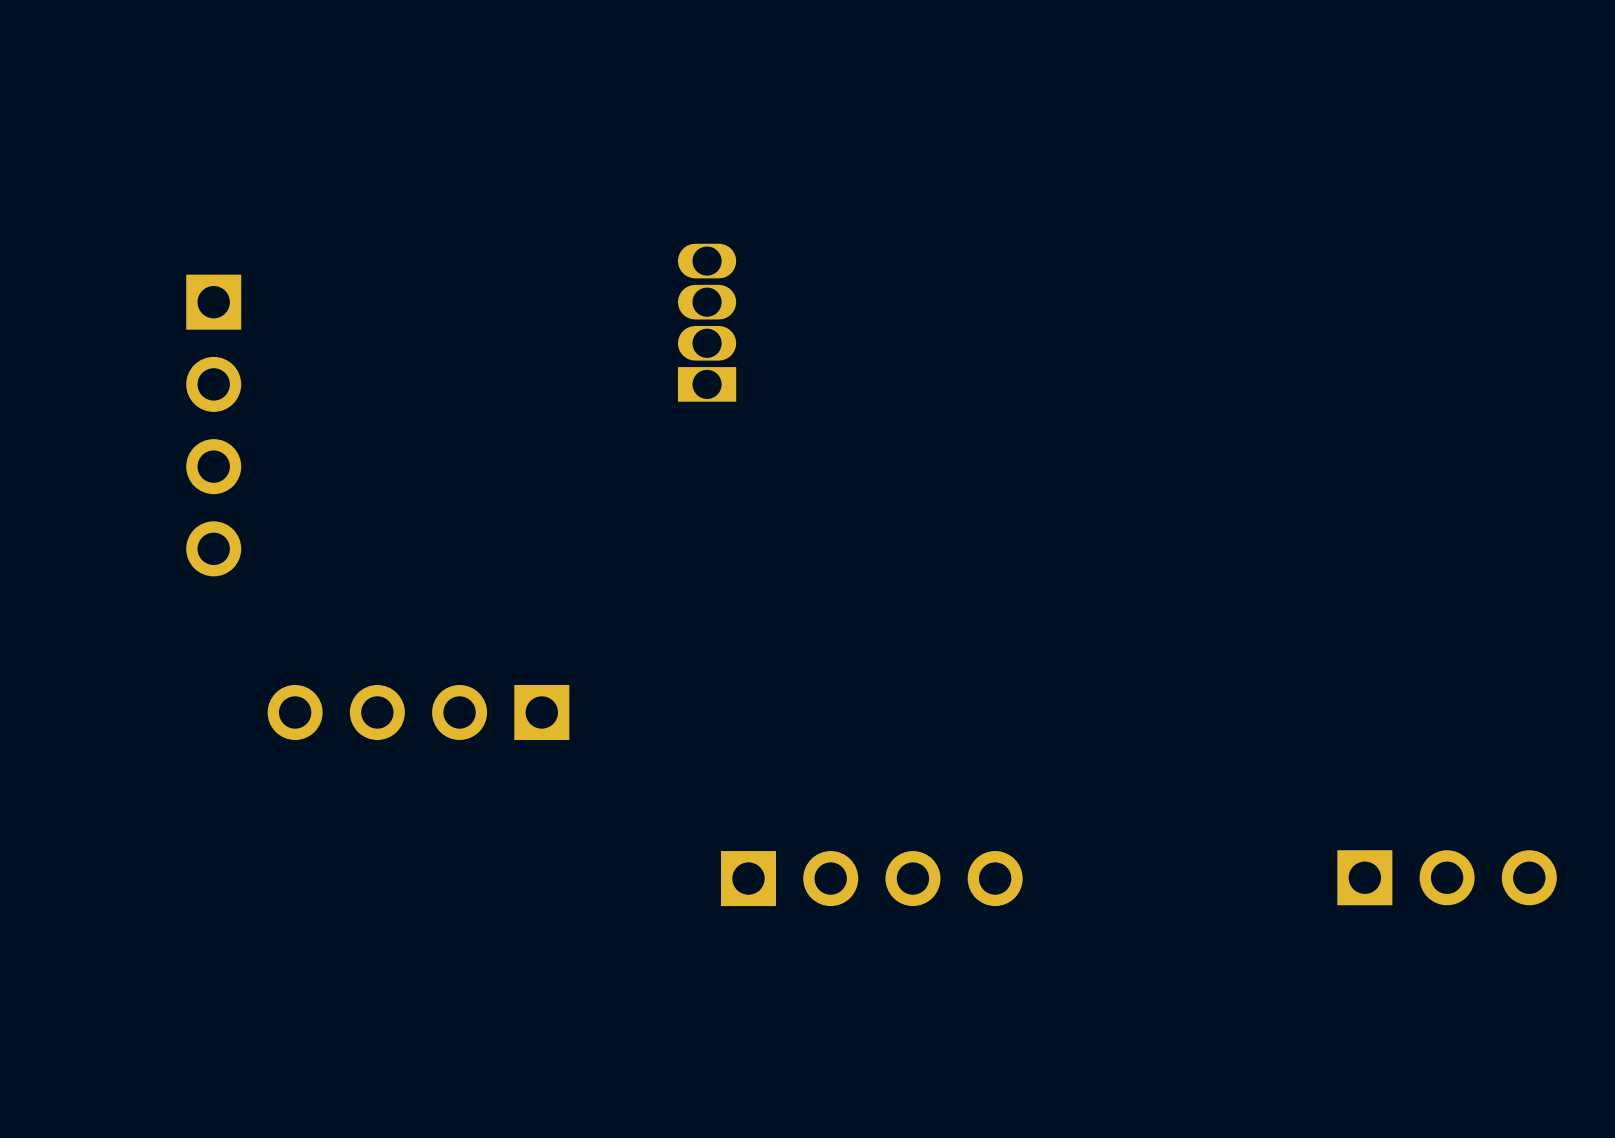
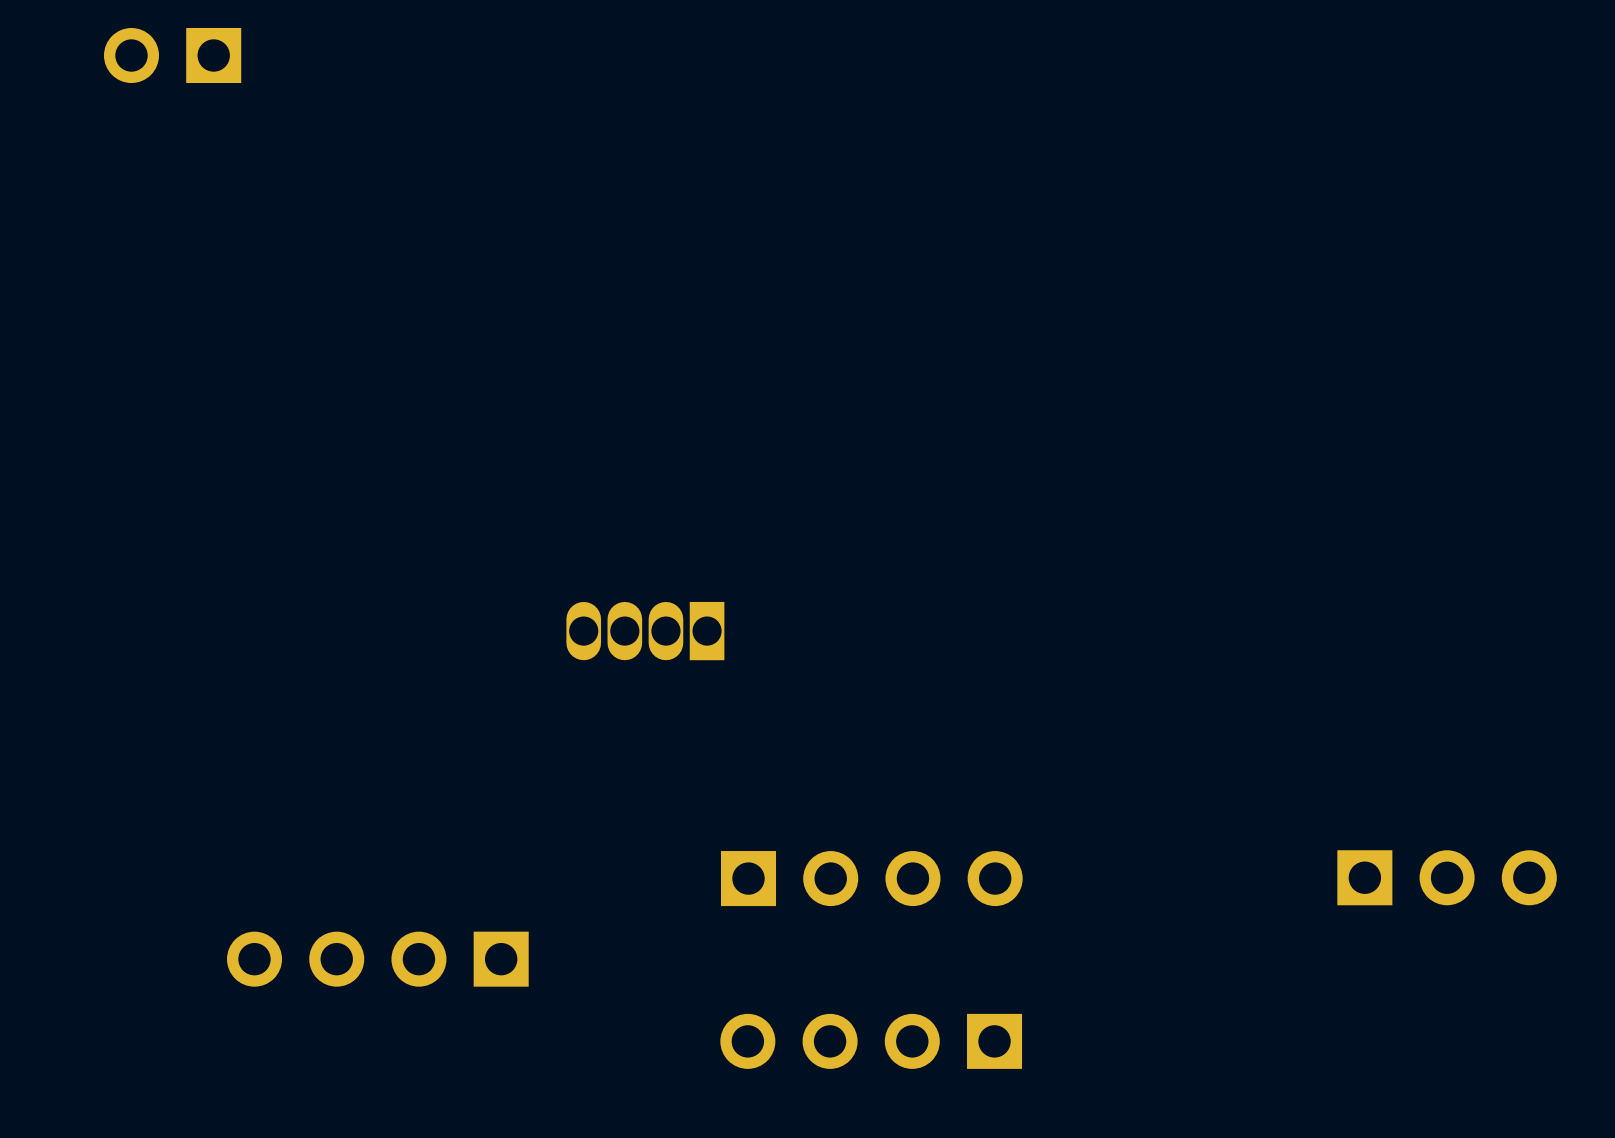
part: none -> (172, 55)
part rotation: 0° (707, 322) -> 90° counterclockwise (645, 631)
part position: (707, 322) -> (645, 631)
part: (213, 425) -> none
part position: (418, 712) -> (377, 959)
part: none -> (871, 1041)

